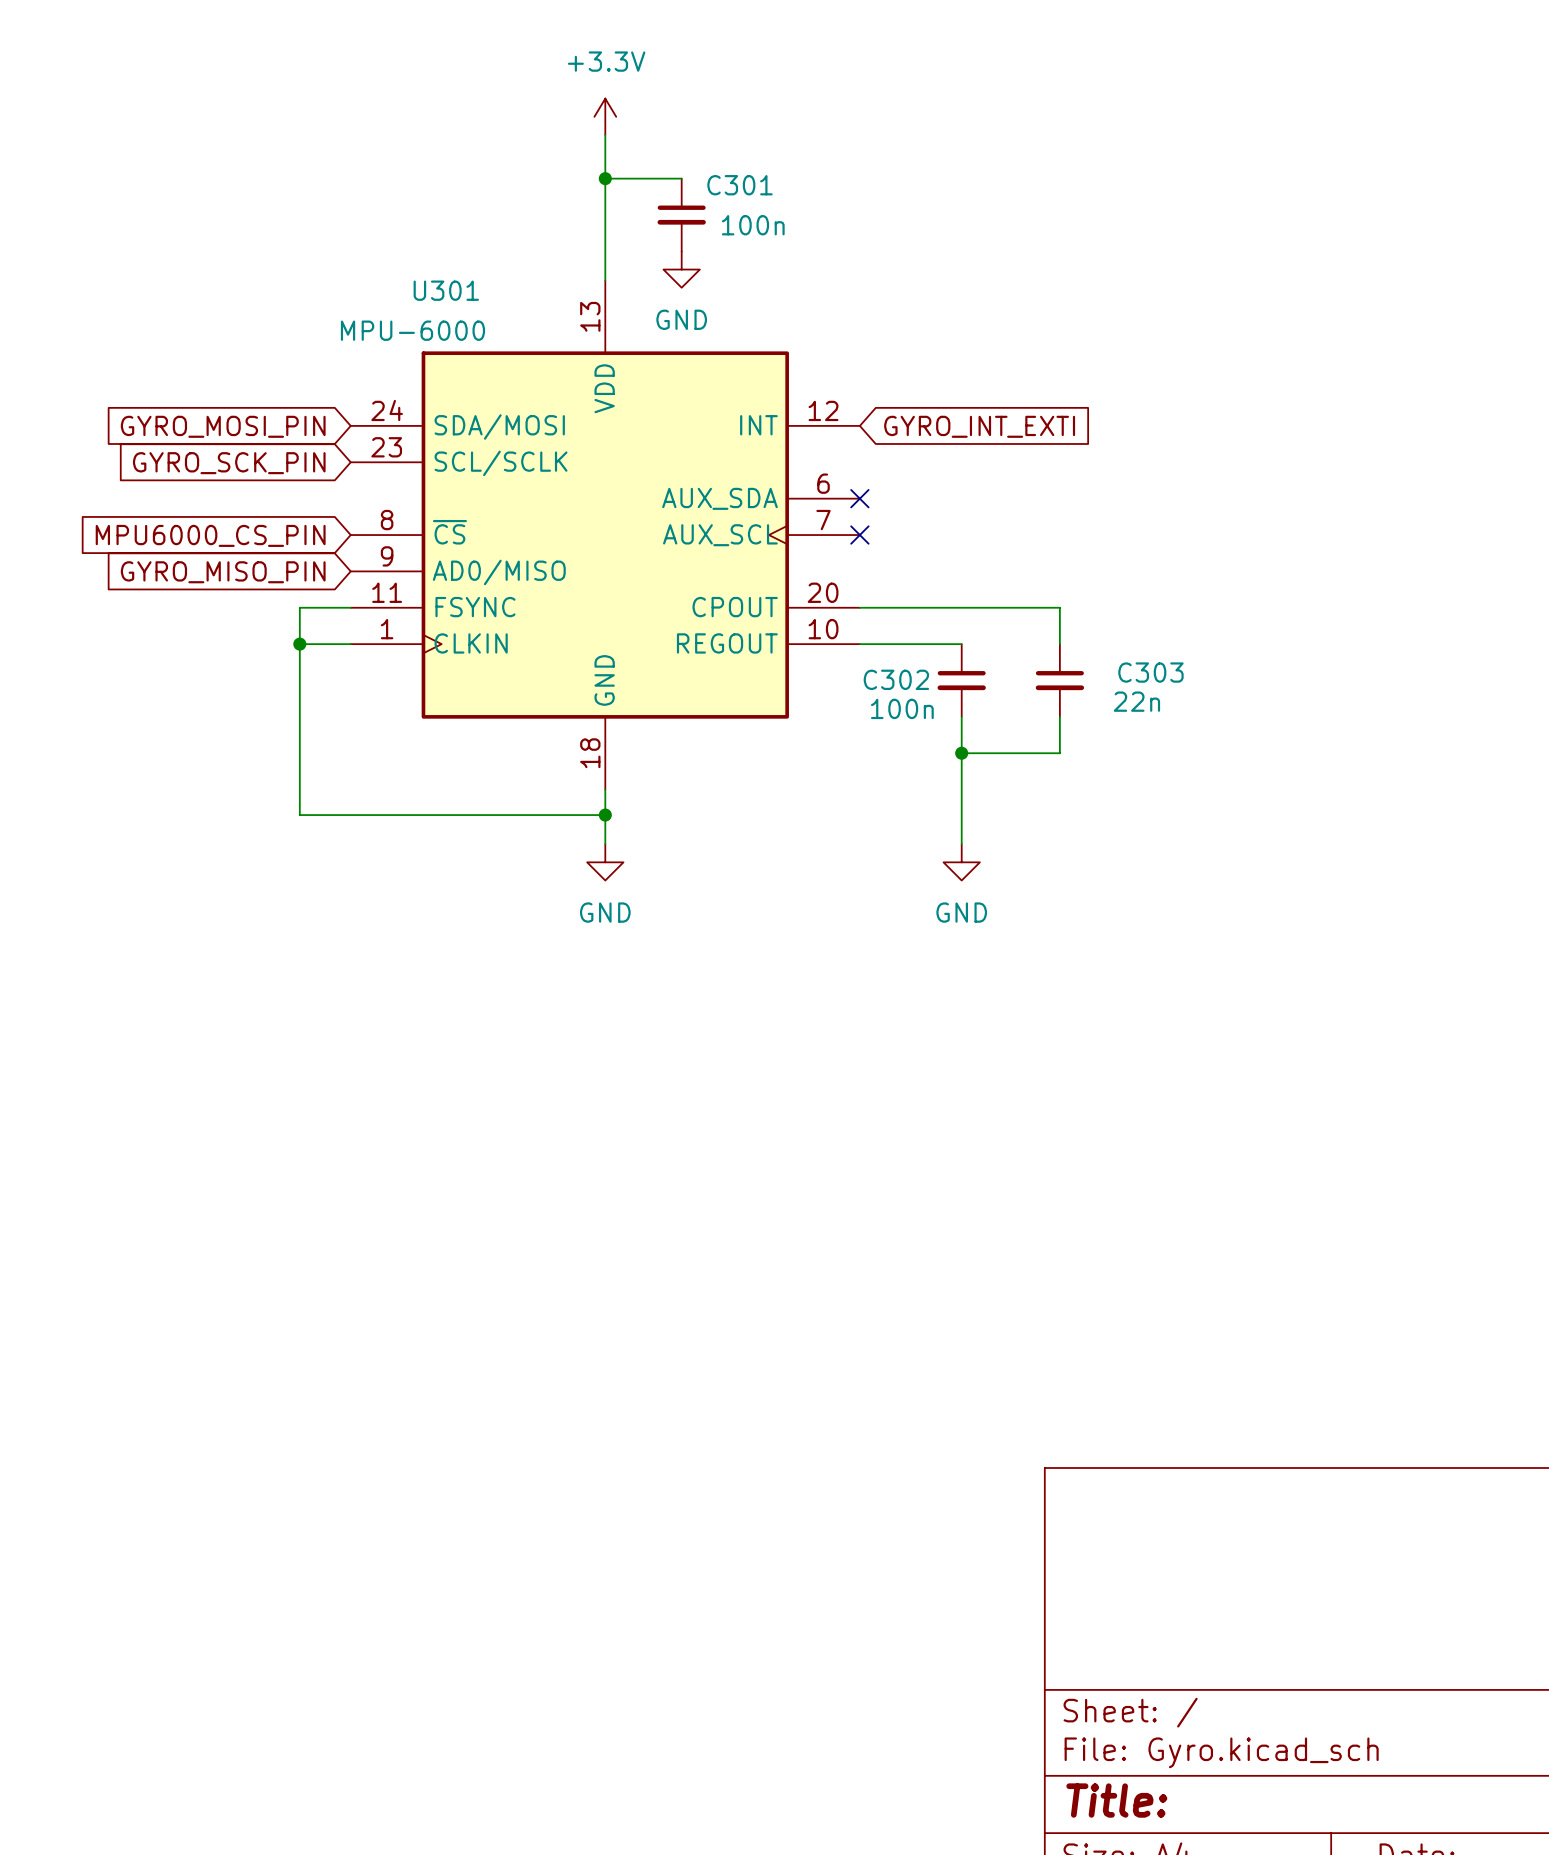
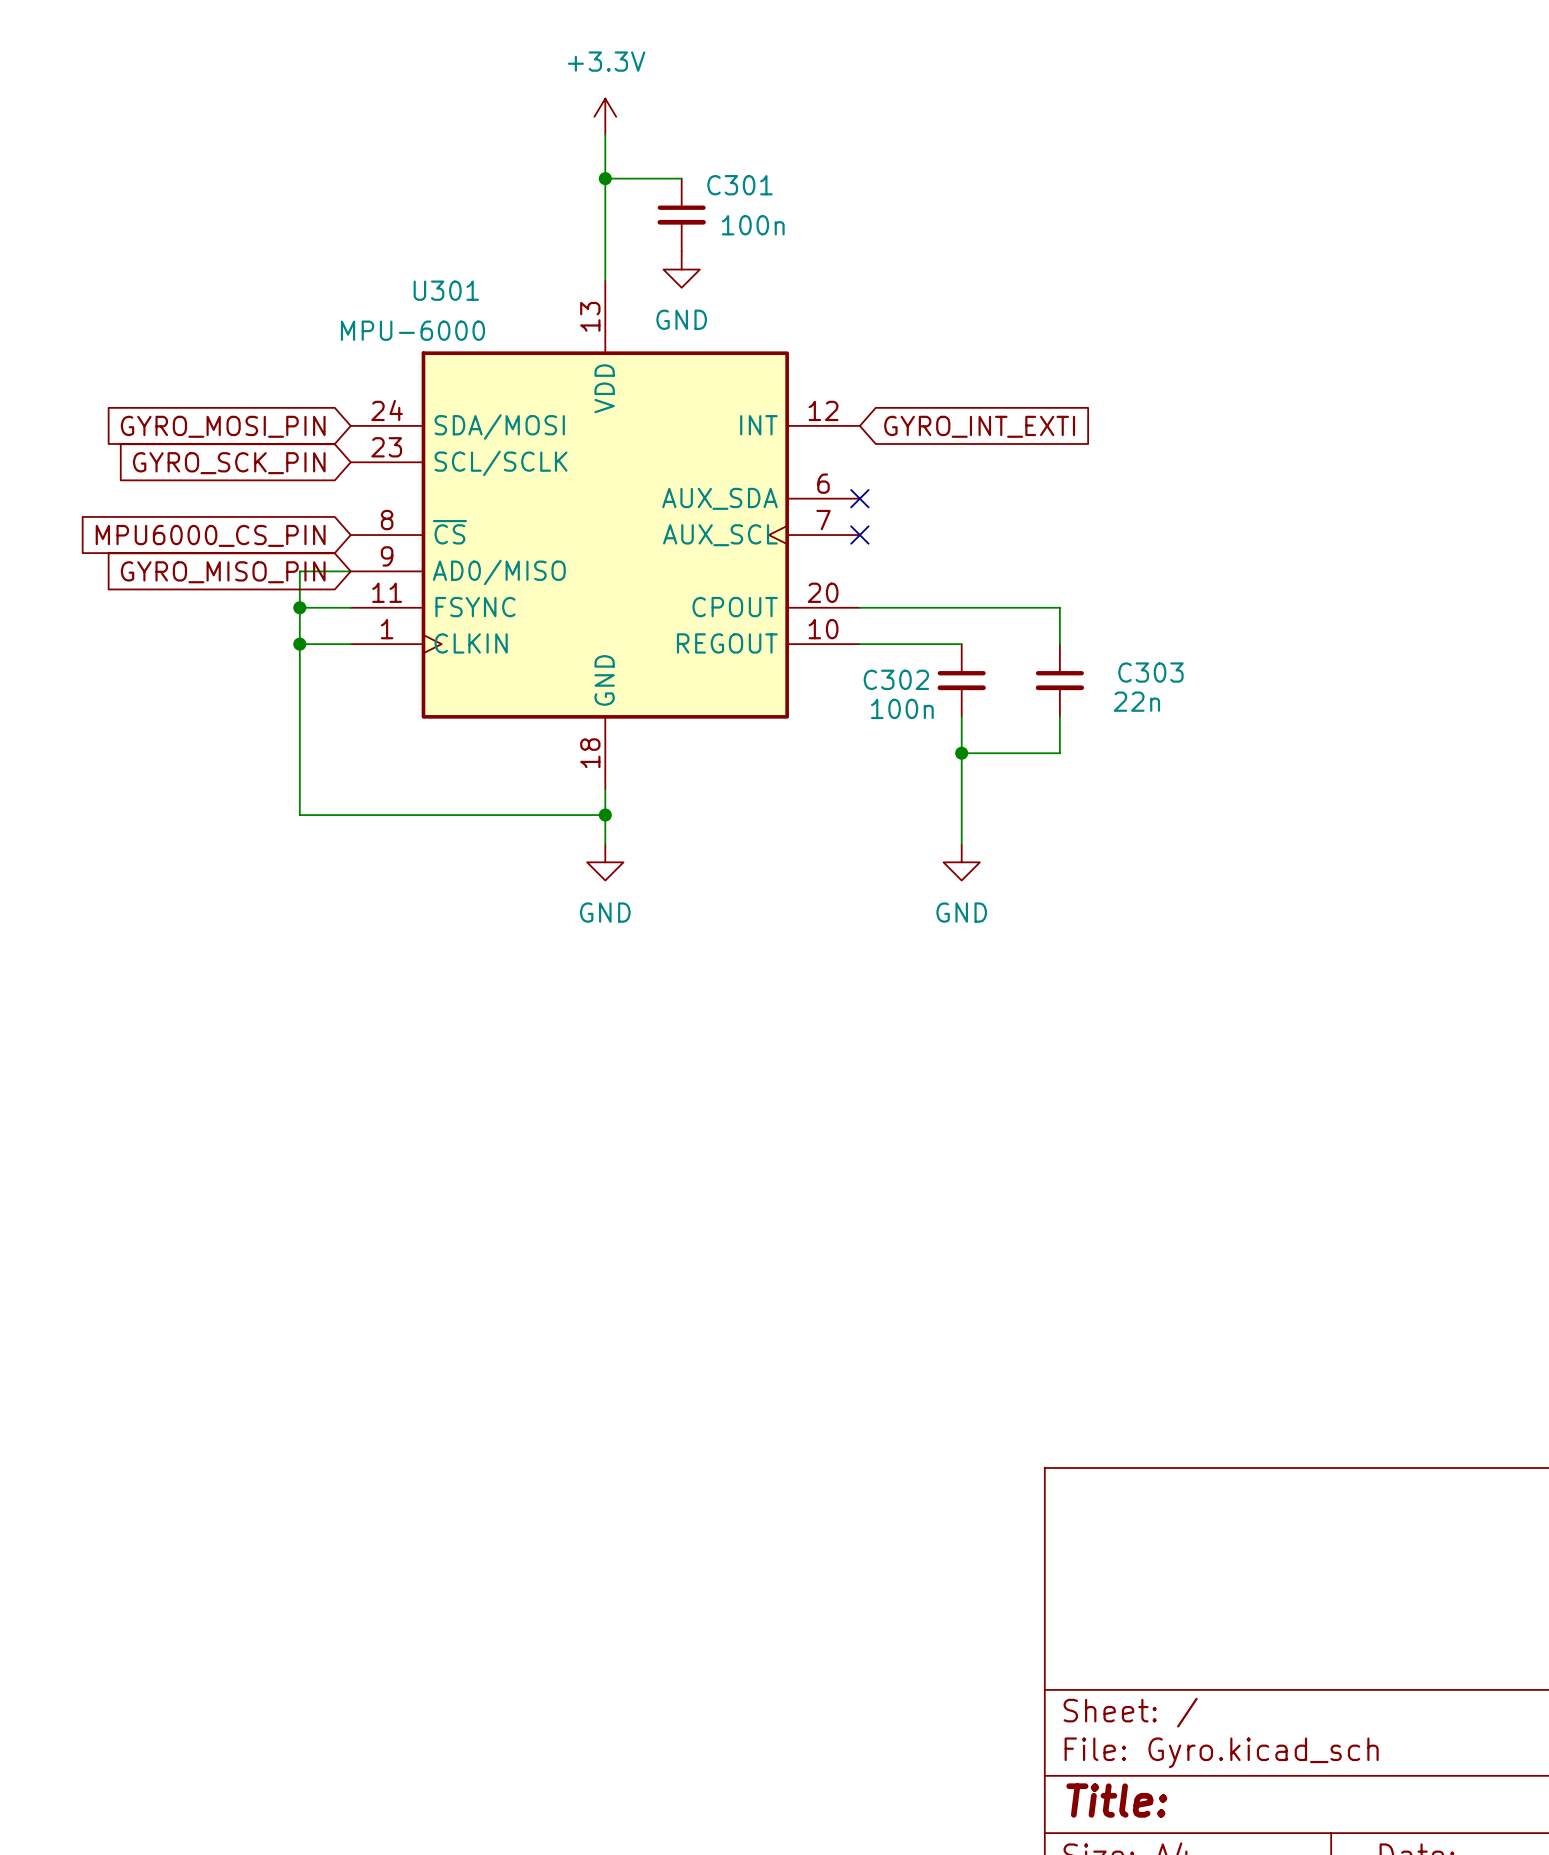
wire: none -> (350, 571) (299, 571) (299, 607)
junction: none -> (299, 607)

